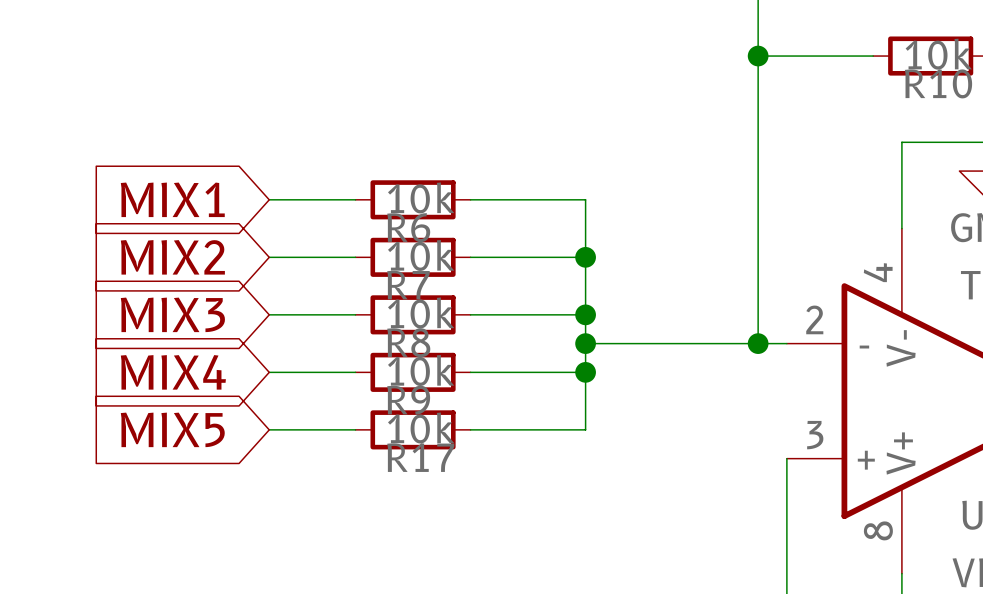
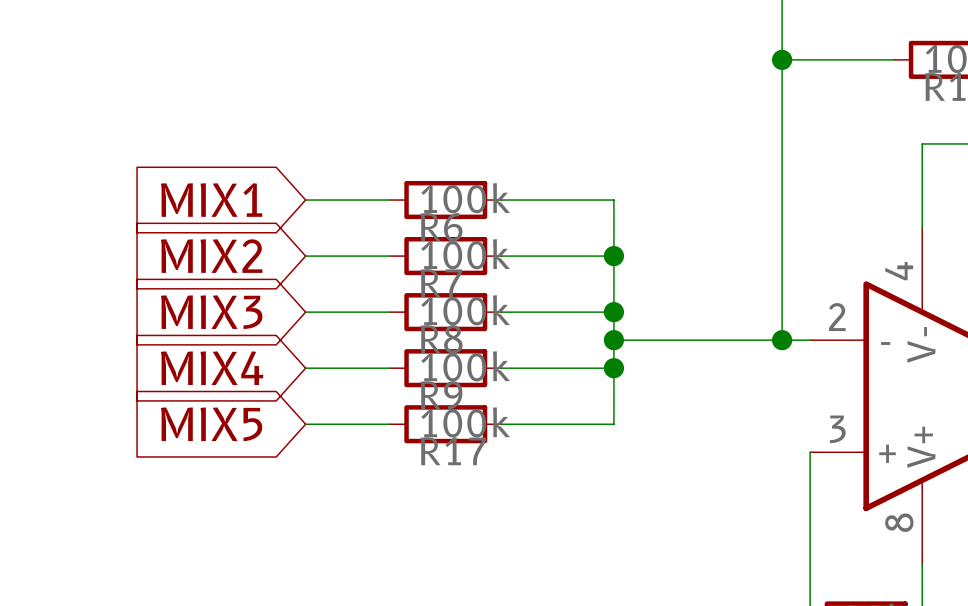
R6 value: 10k (421, 197) -> 100k (465, 198)
R7 value: 10k (421, 255) -> 100k (465, 254)
R8 value: 10k (421, 312) -> 100k (465, 310)
R9 value: 10k (421, 370) -> 100k (465, 366)
R17 value: 10k (421, 428) -> 100k (465, 422)

